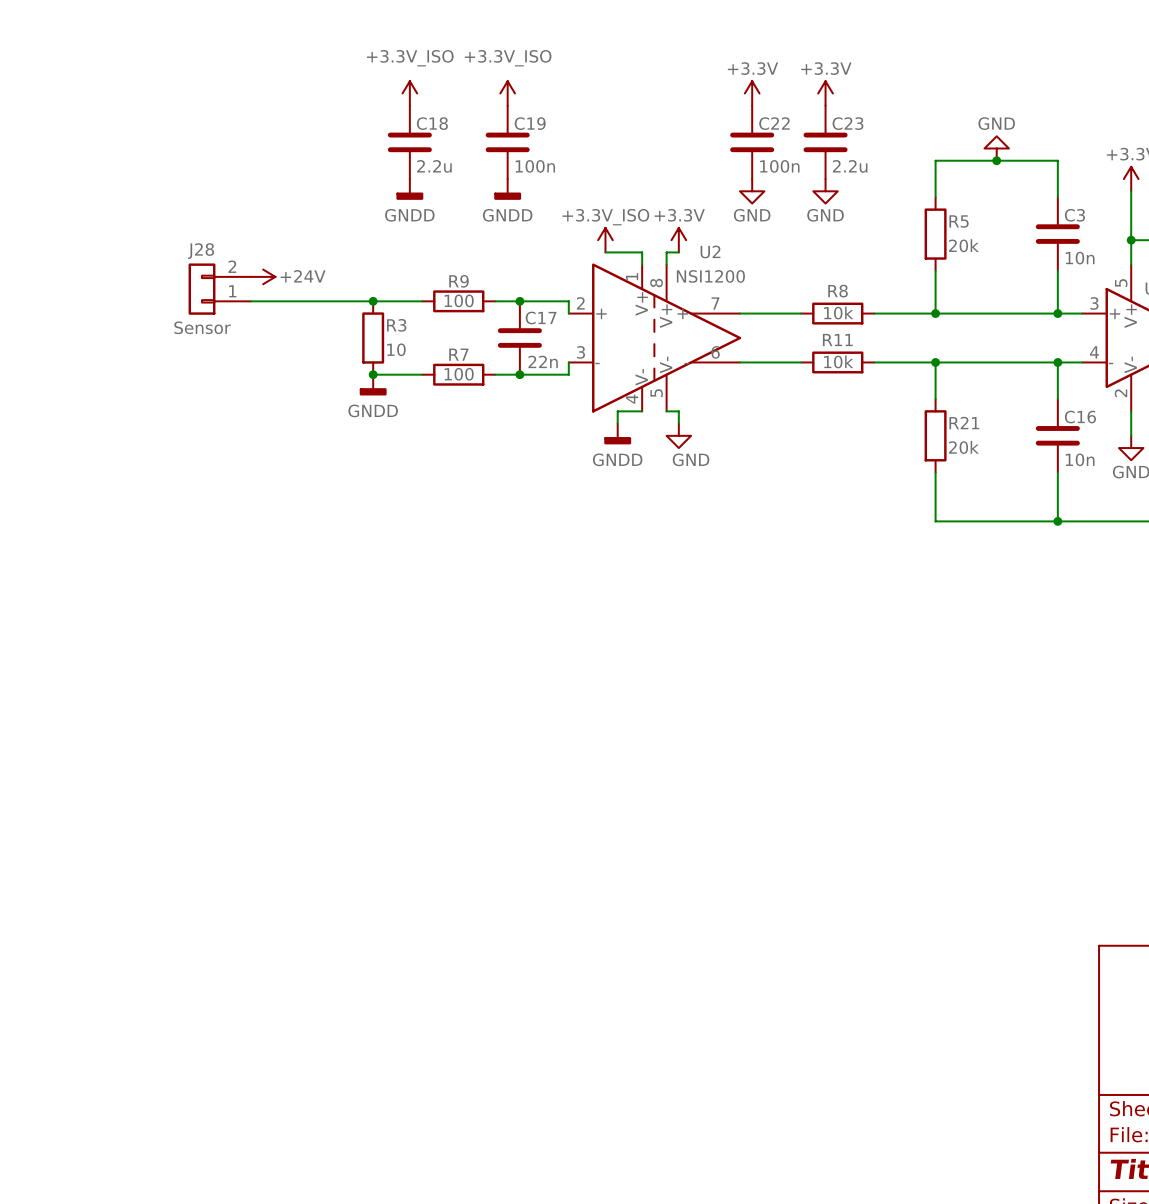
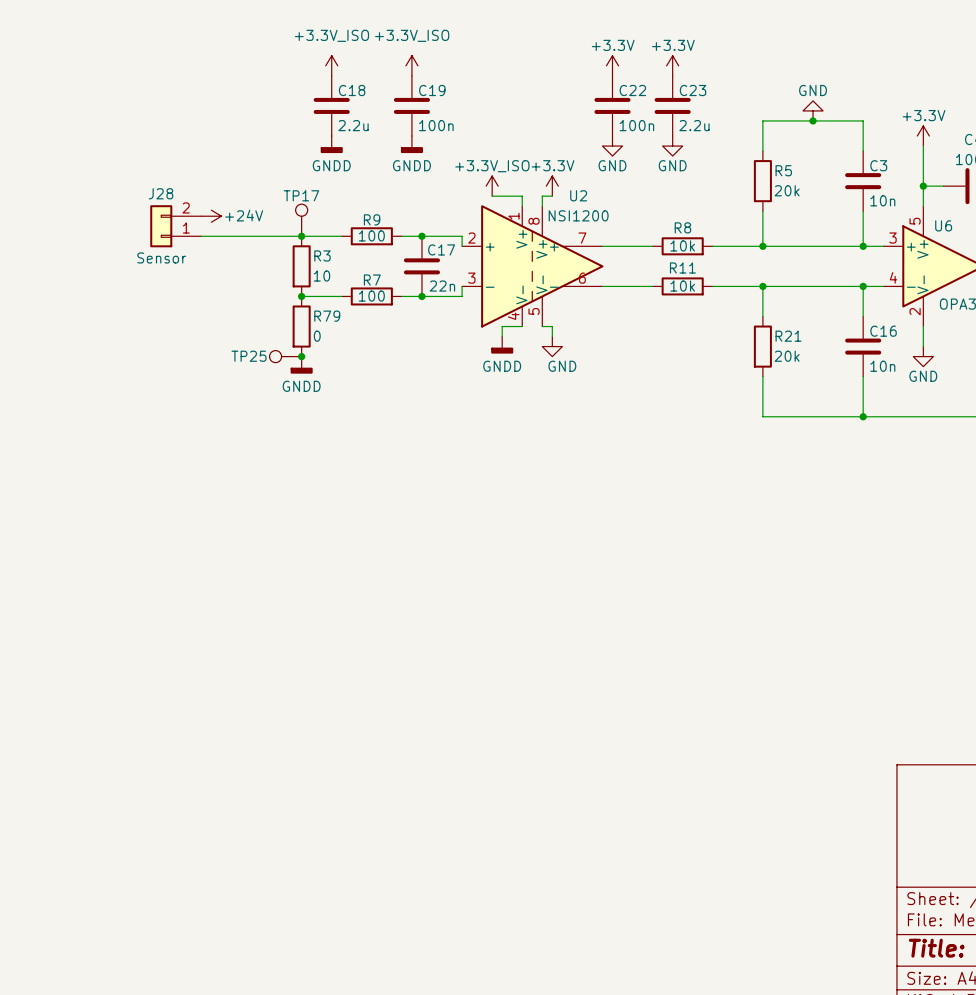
TP17: none -> (301, 220)
power symbol position: GNDD (373, 385) -> GNDD (301, 365)
R79: none -> 0 (301, 326)
TP25: none -> (285, 356)
junction: none -> (301, 356)

